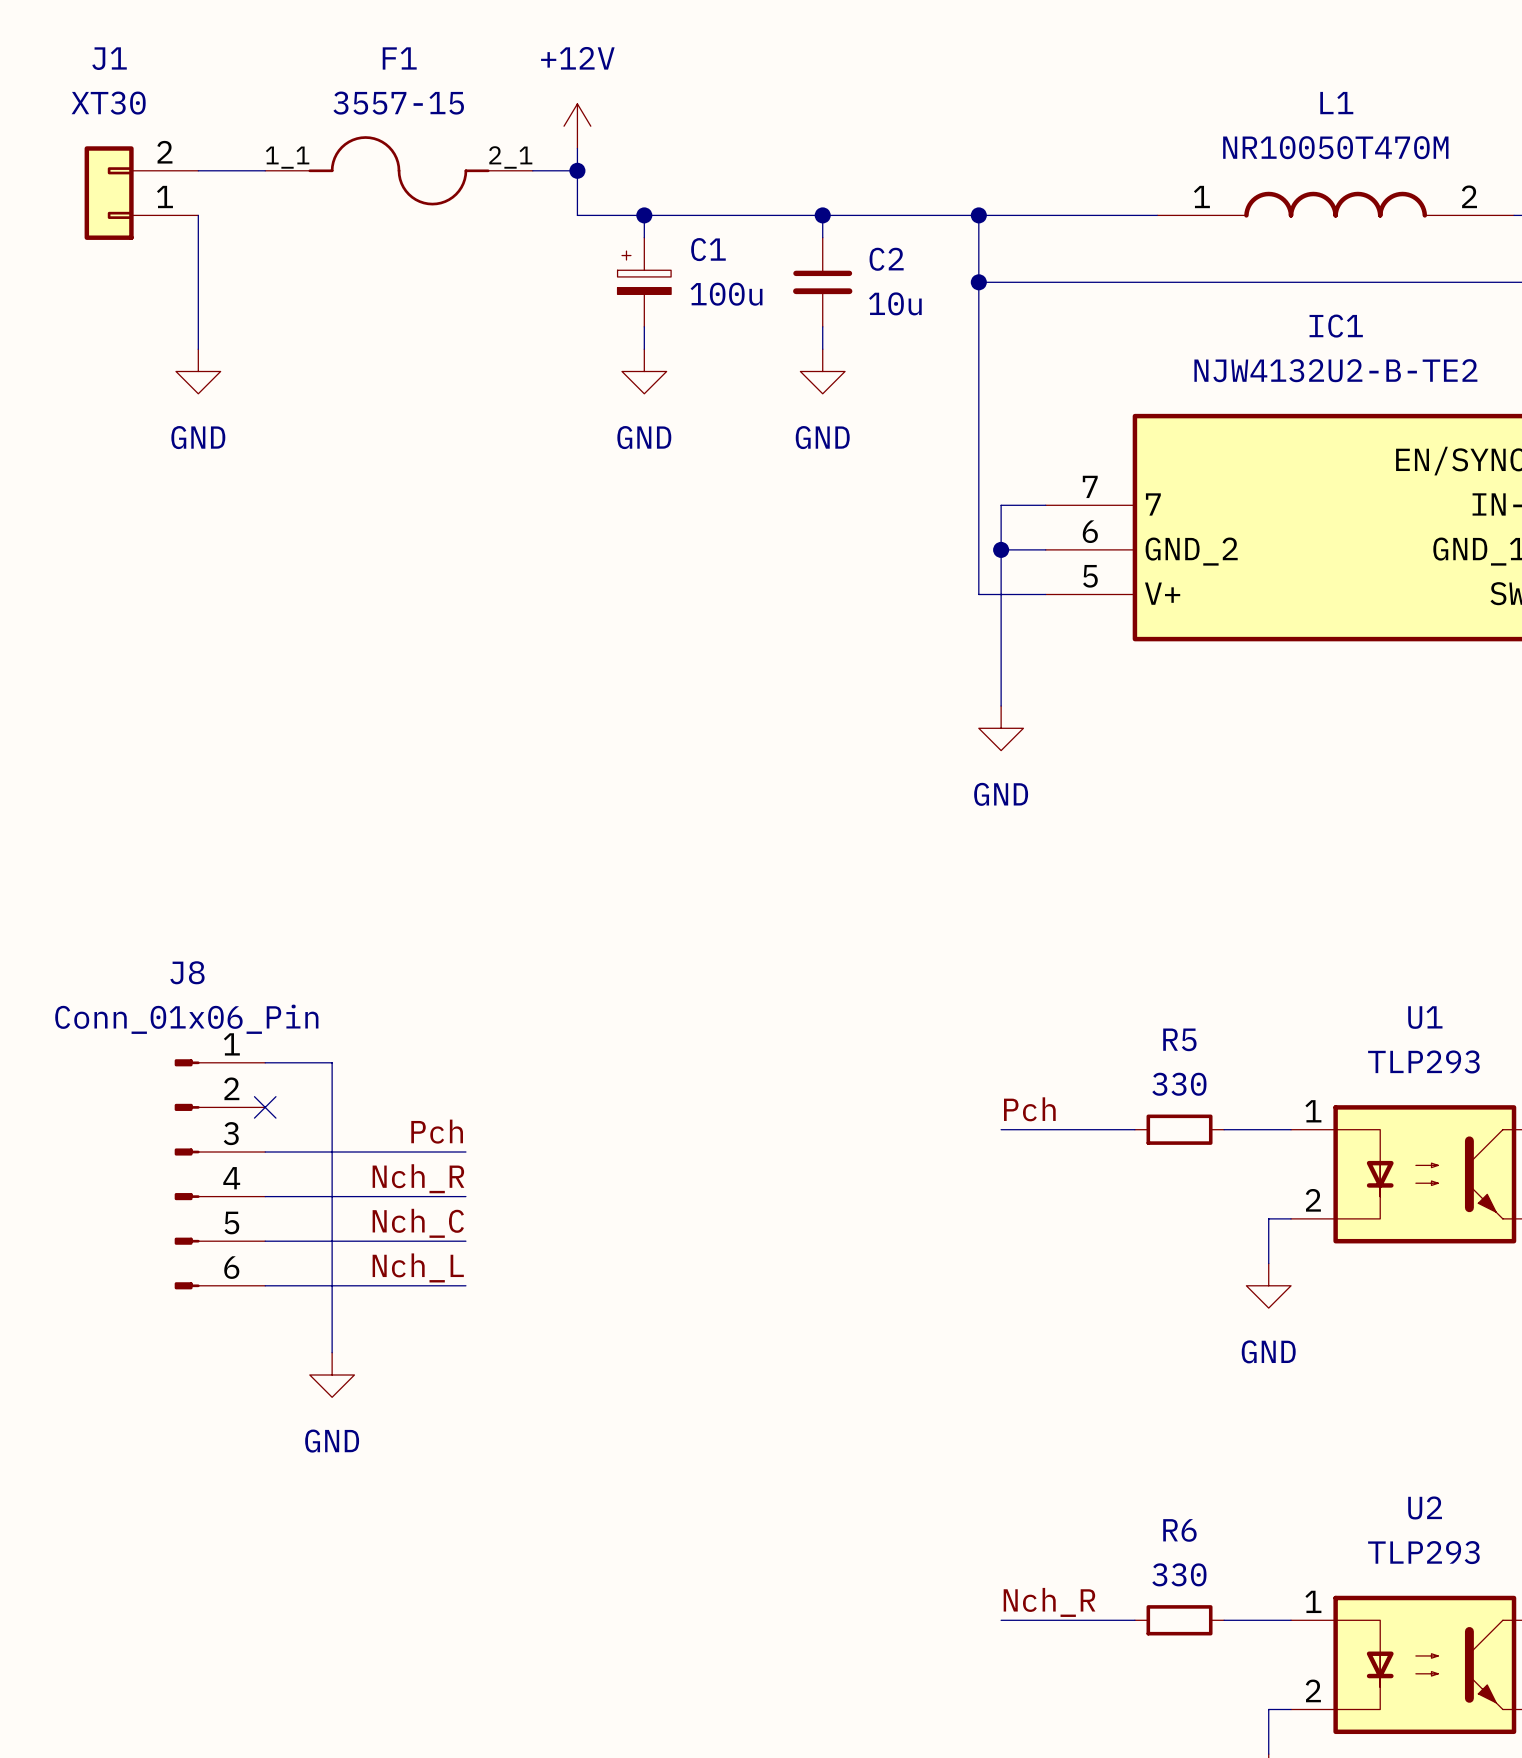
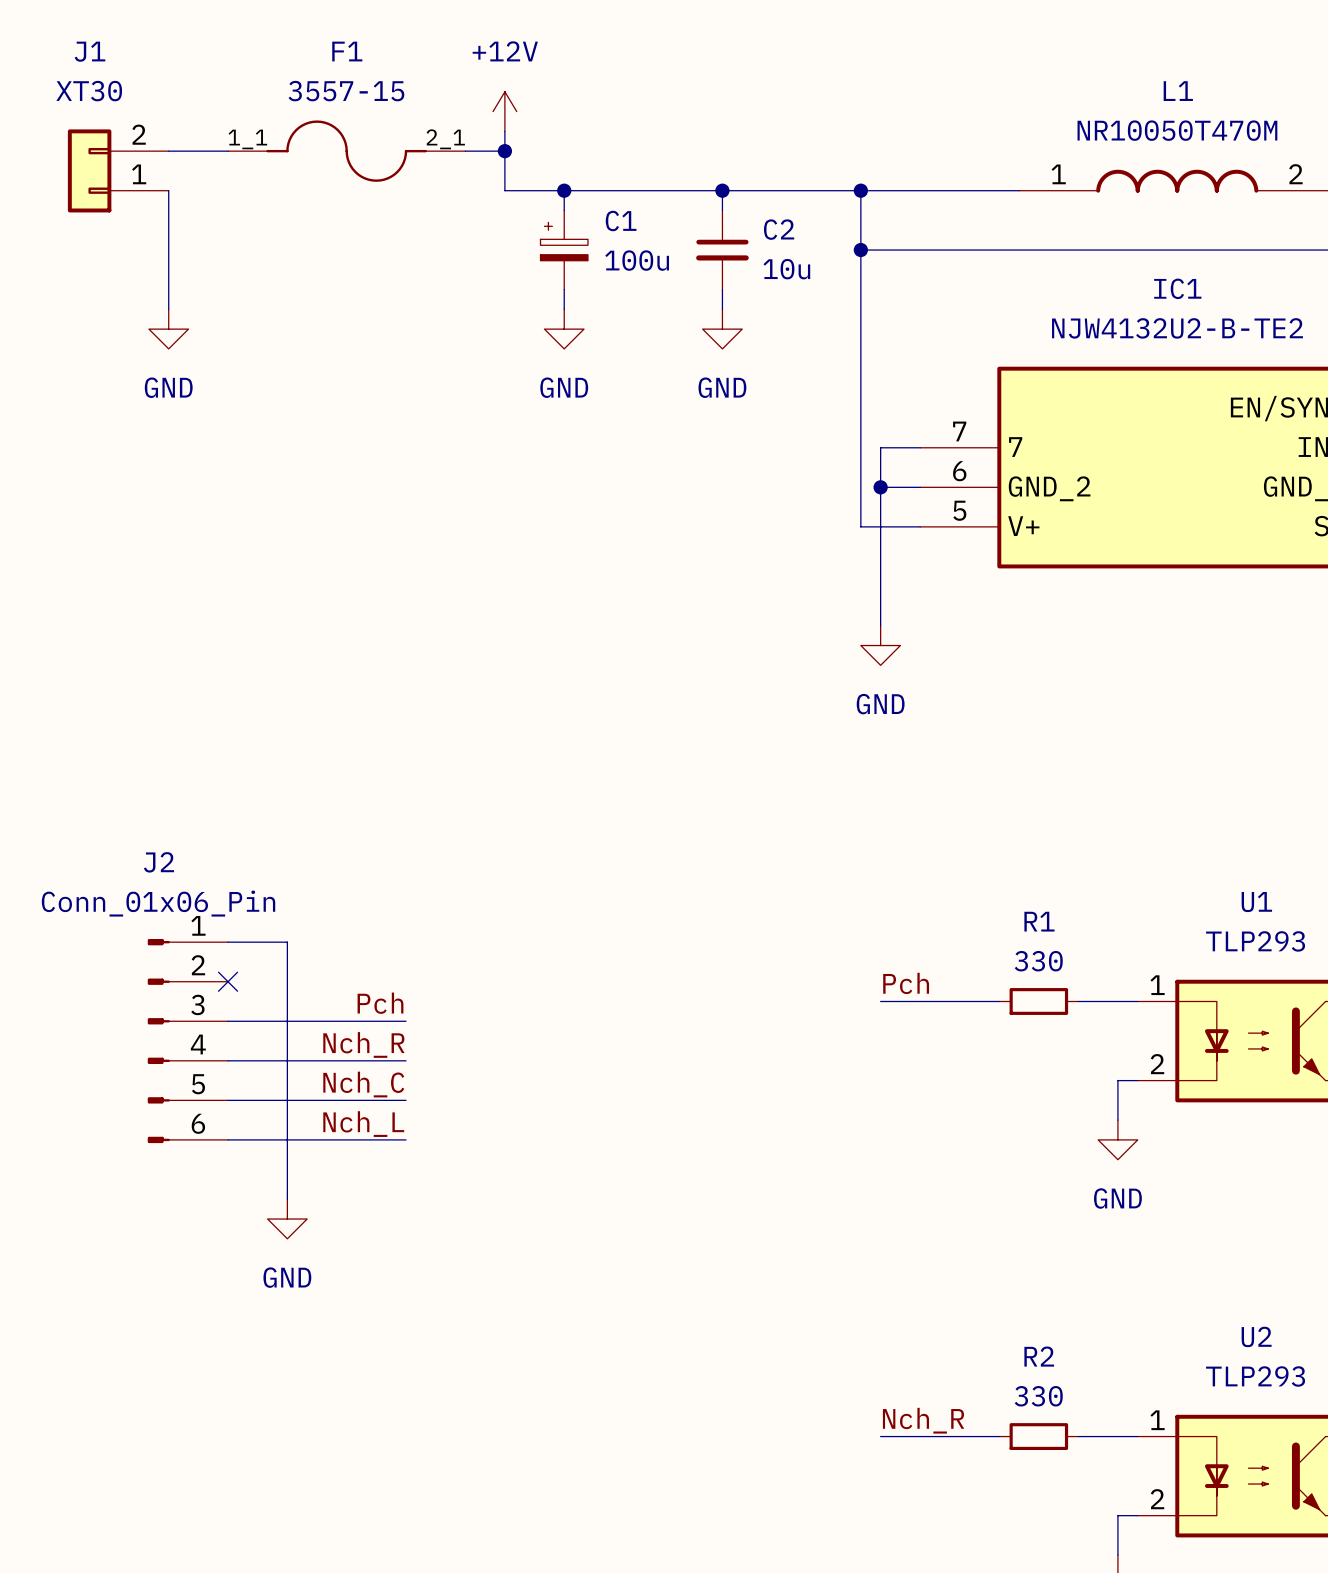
J8 name: J8 (187, 972) -> J2 (158, 862)
R5 name: R5 (1179, 1039) -> R1 (1039, 921)
R6 name: R6 (1179, 1530) -> R2 (1039, 1356)

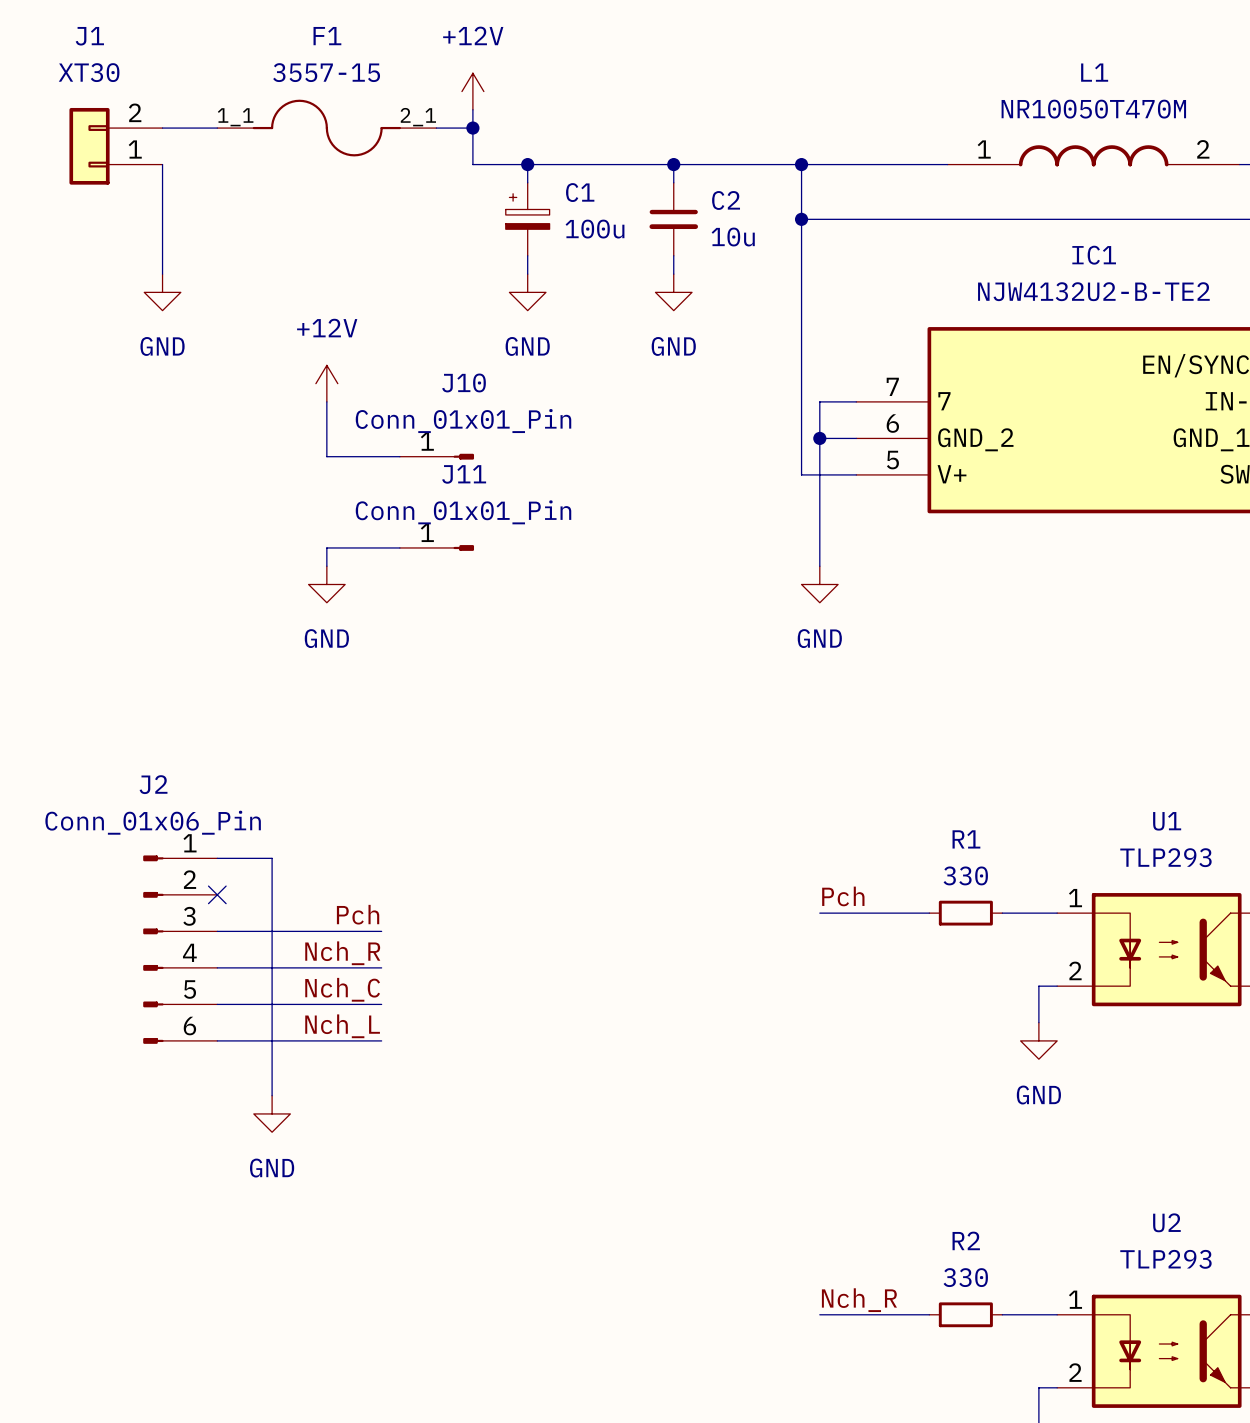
power symbol: none -> +12V (326, 383)
wire: none -> (326, 401) (326, 456) (399, 456)
J10: none -> Conn_01x01_Pin (436, 456)
wire: none -> (399, 547) (326, 547) (326, 566)
J11: none -> Conn_01x01_Pin (436, 547)
power symbol: none -> GND (326, 584)

